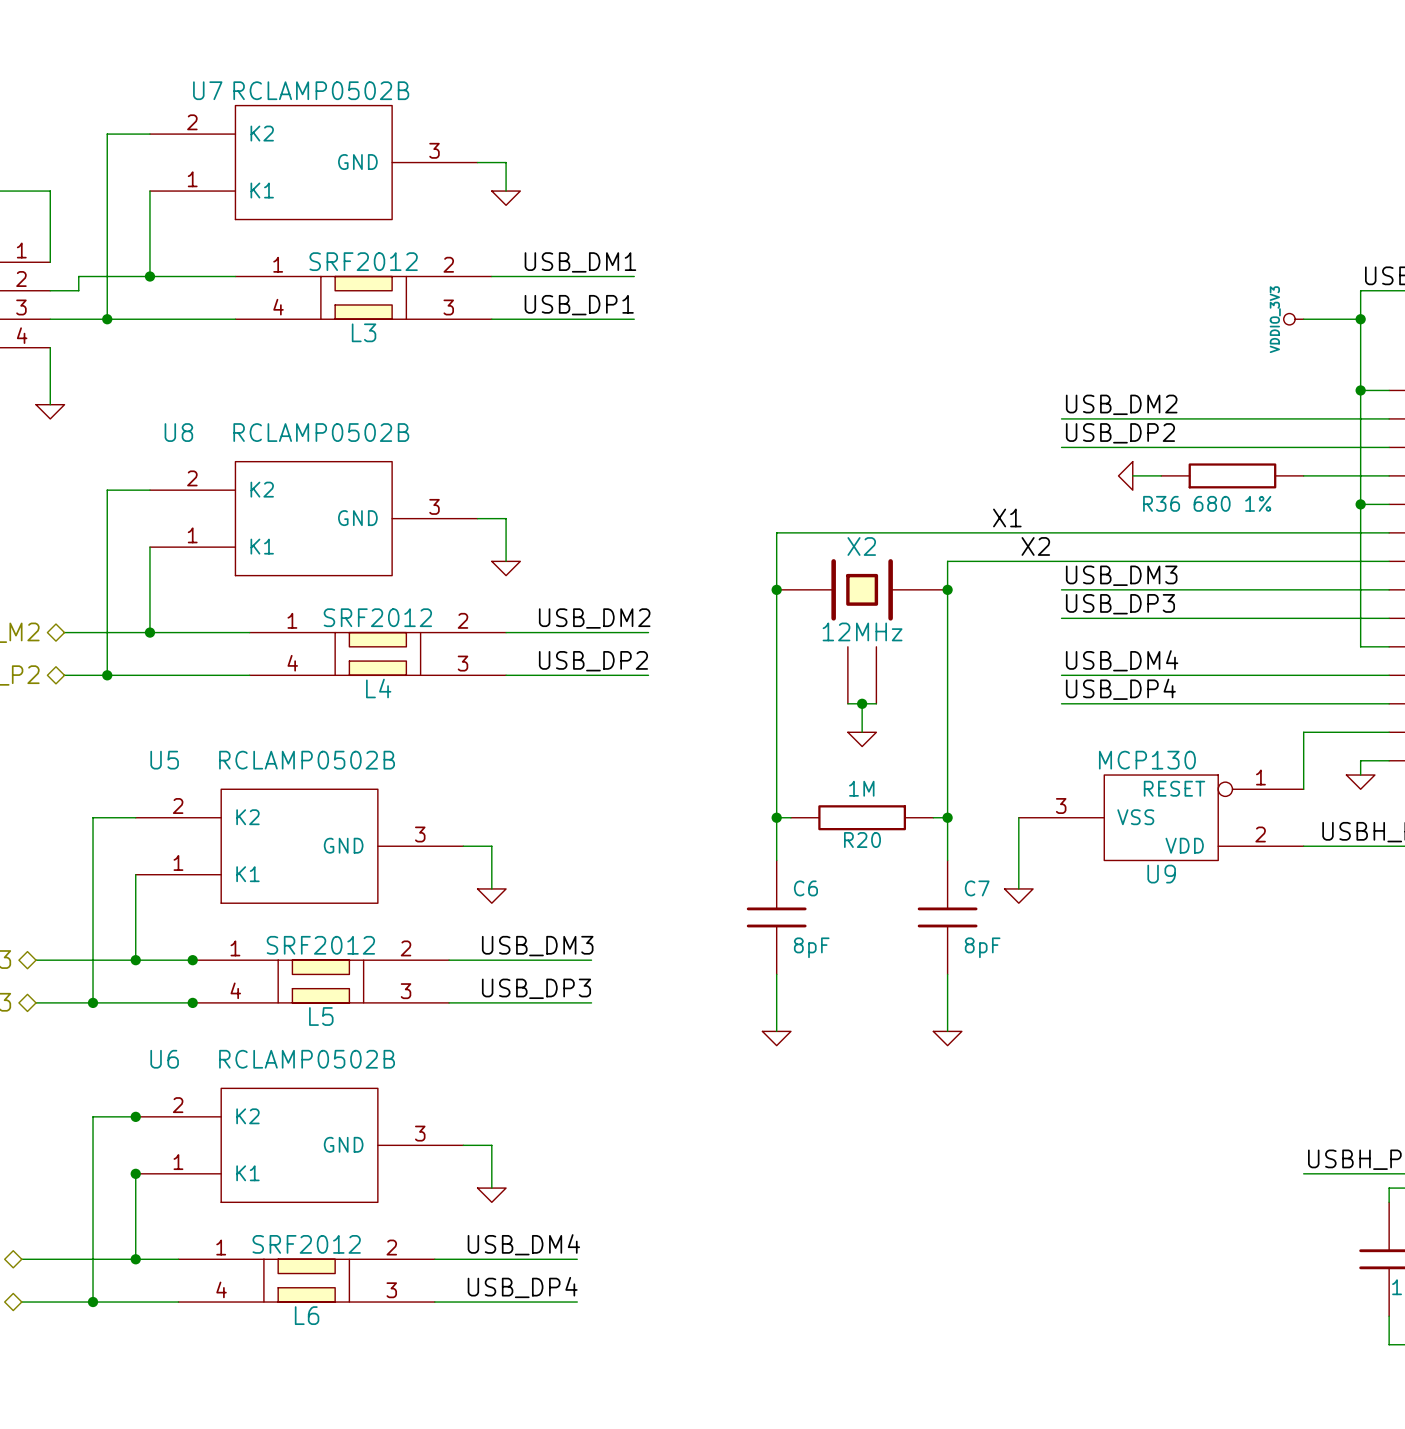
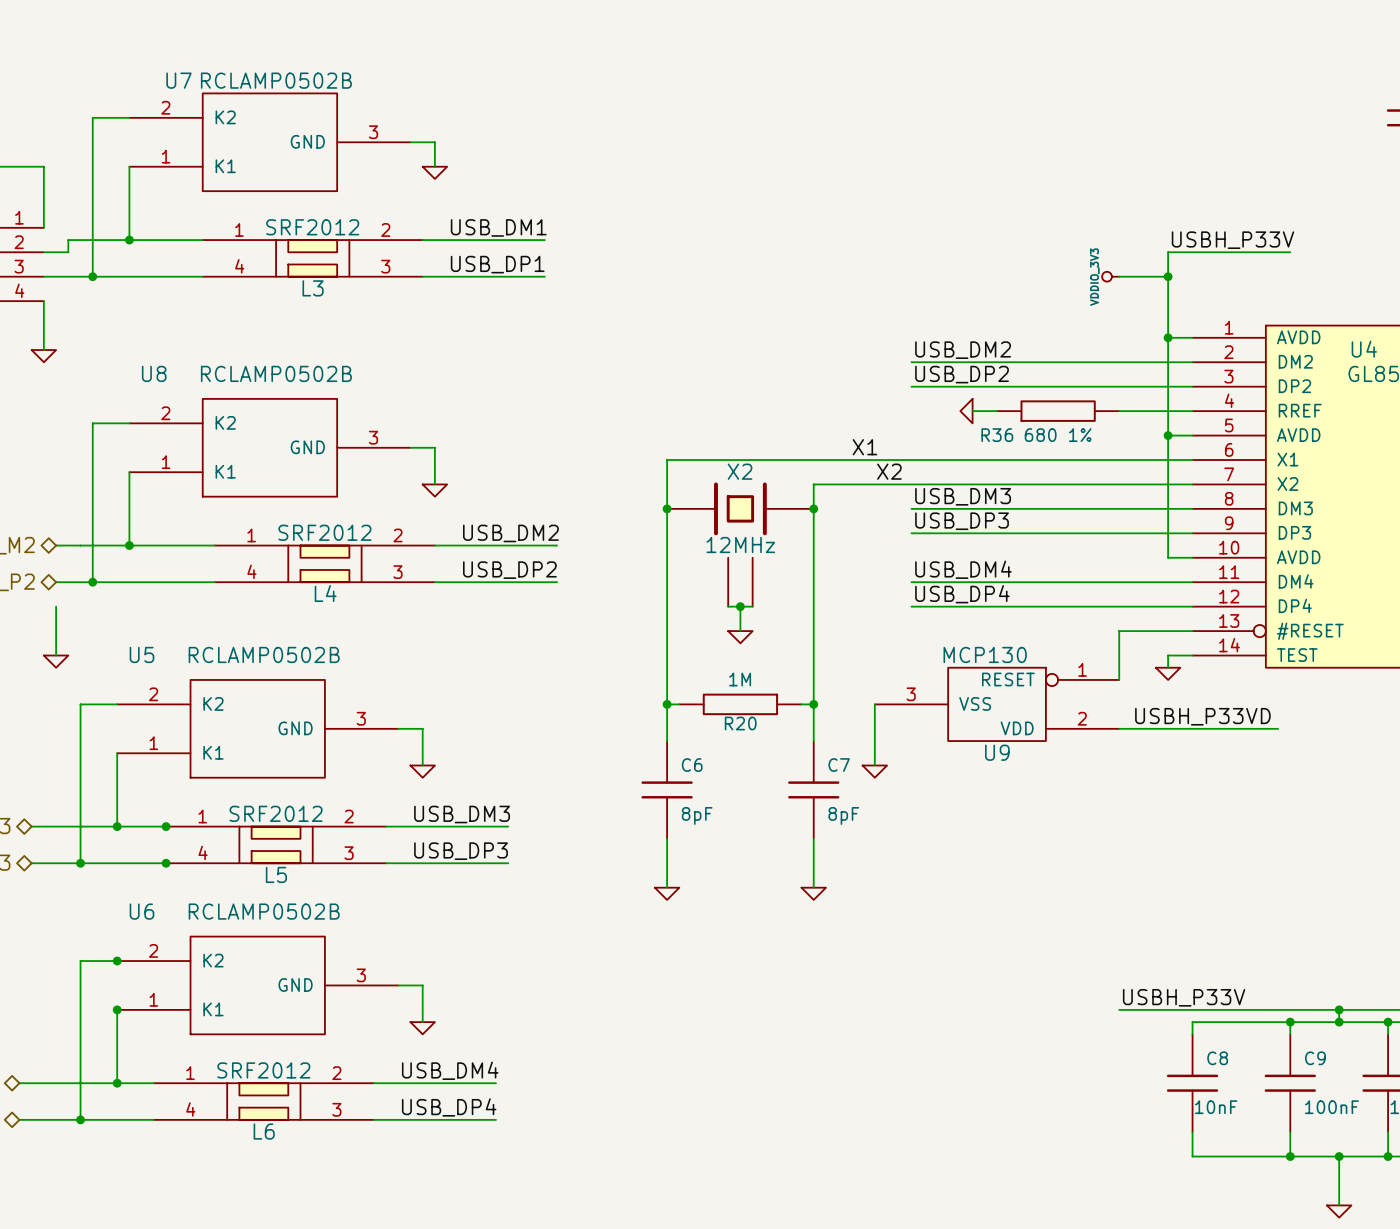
wire: none -> (56, 606) (56, 655)
power symbol: none -> (56, 661)

